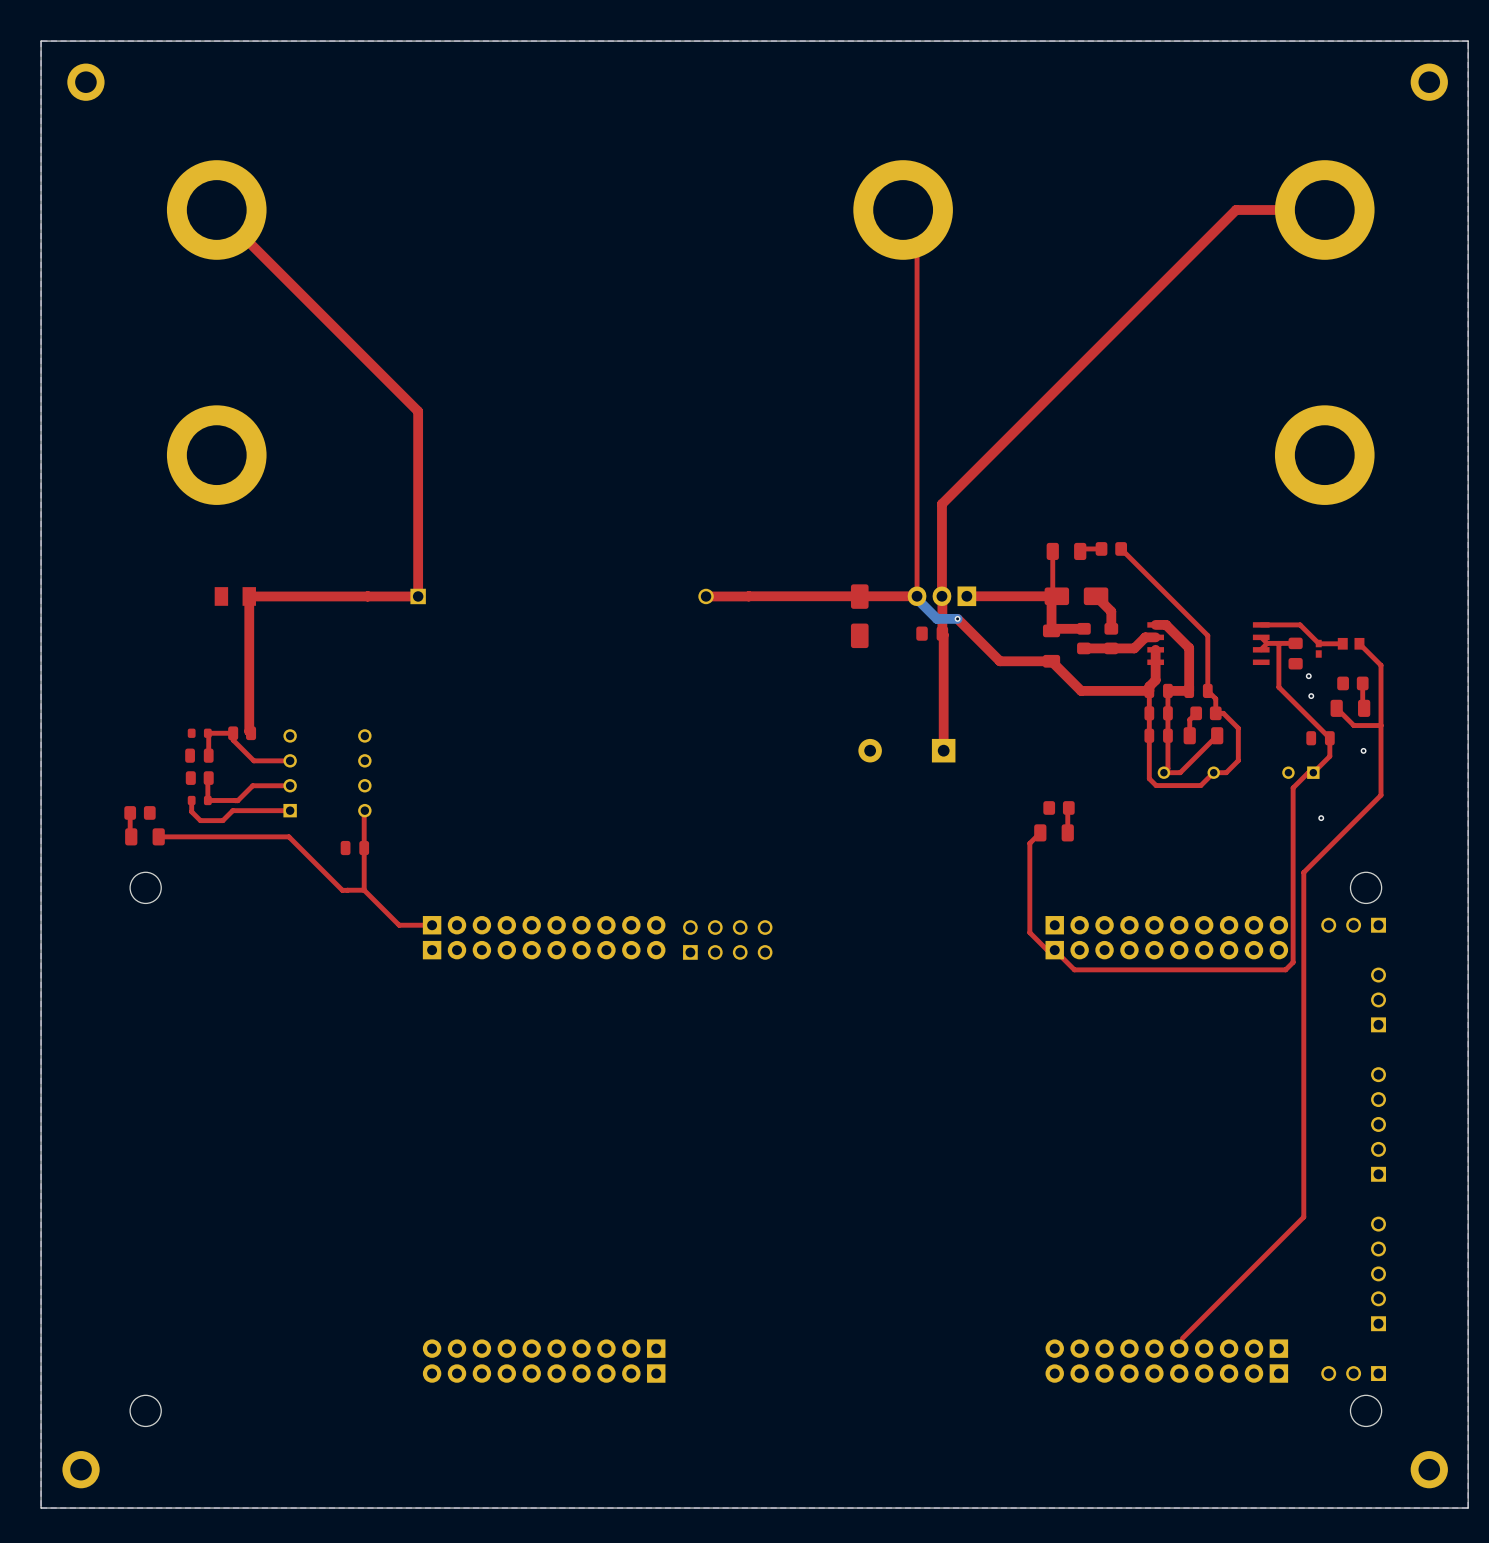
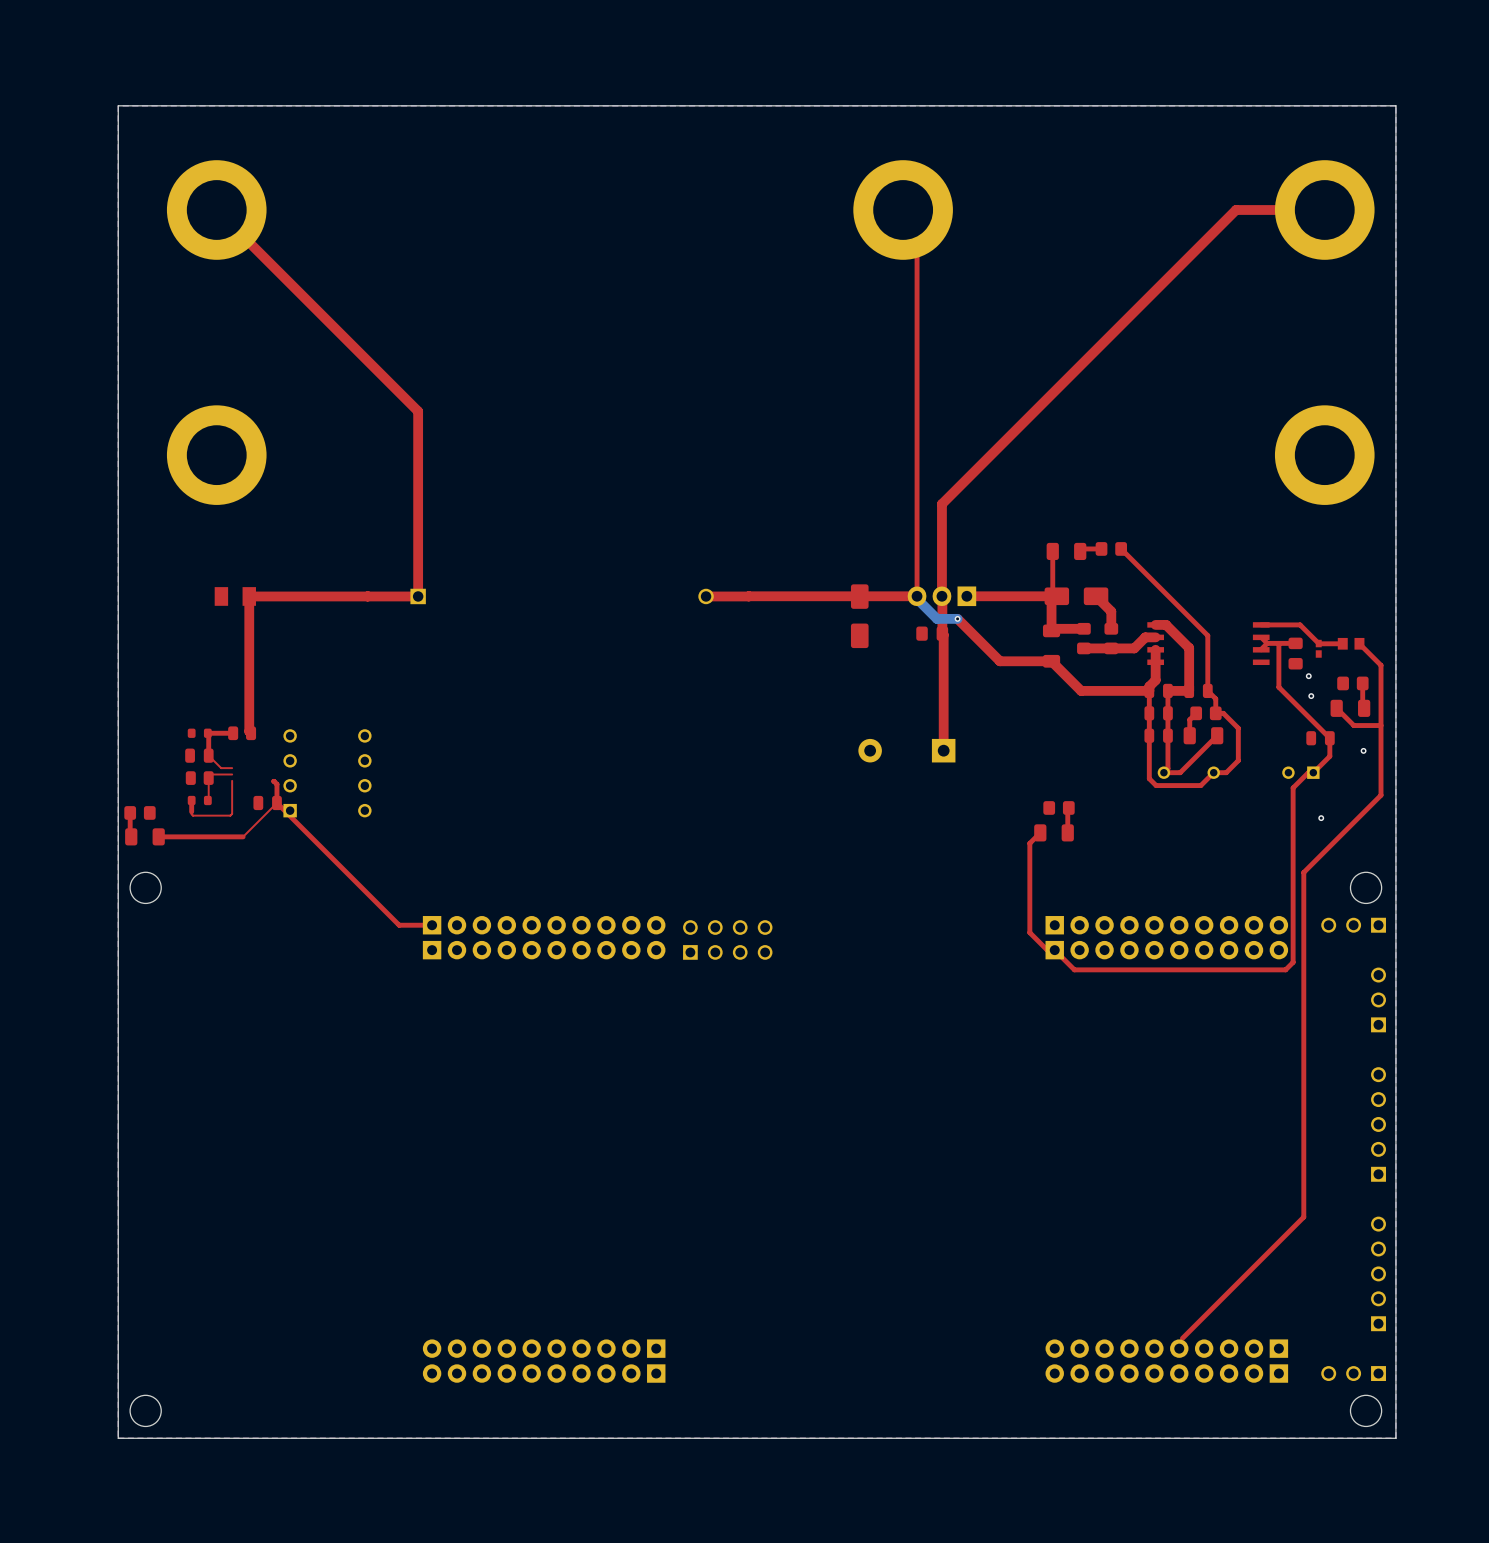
board edge: (1468, 41) (41, 41) (41, 1508) (1468, 1508) (1468, 41) -> (1395, 105) (1395, 1438) (118, 1438) (118, 105) (1395, 105)
part: (85, 82) -> none
part: (1429, 82) -> none
top track: (233, 733) (233, 740) (253, 760) (290, 760) -> none
top track: none -> (208, 755) (221, 768) (232, 768)
top track: none -> (232, 774) (212, 774) (208, 778) (208, 800)
top track: (208, 778) (207, 800) (237, 800) (252, 785) (290, 785) -> none
top track: none -> (273, 781) (276, 784) (276, 802)
top track: none -> (276, 802) (364, 890)
top track: (290, 810) (232, 810) (222, 820) (200, 820) (191, 811) -> (232, 780) (232, 813) (230, 815) (192, 815) (191, 811)
top track: (364, 810) (364, 890) (347, 890) -> none
top track: (243, 836) (288, 836) (342, 890) (347, 890) -> (243, 836) (276, 802)
part position: (354, 848) -> (267, 802)
part: (81, 1469) -> none
part: (1429, 1469) -> none

